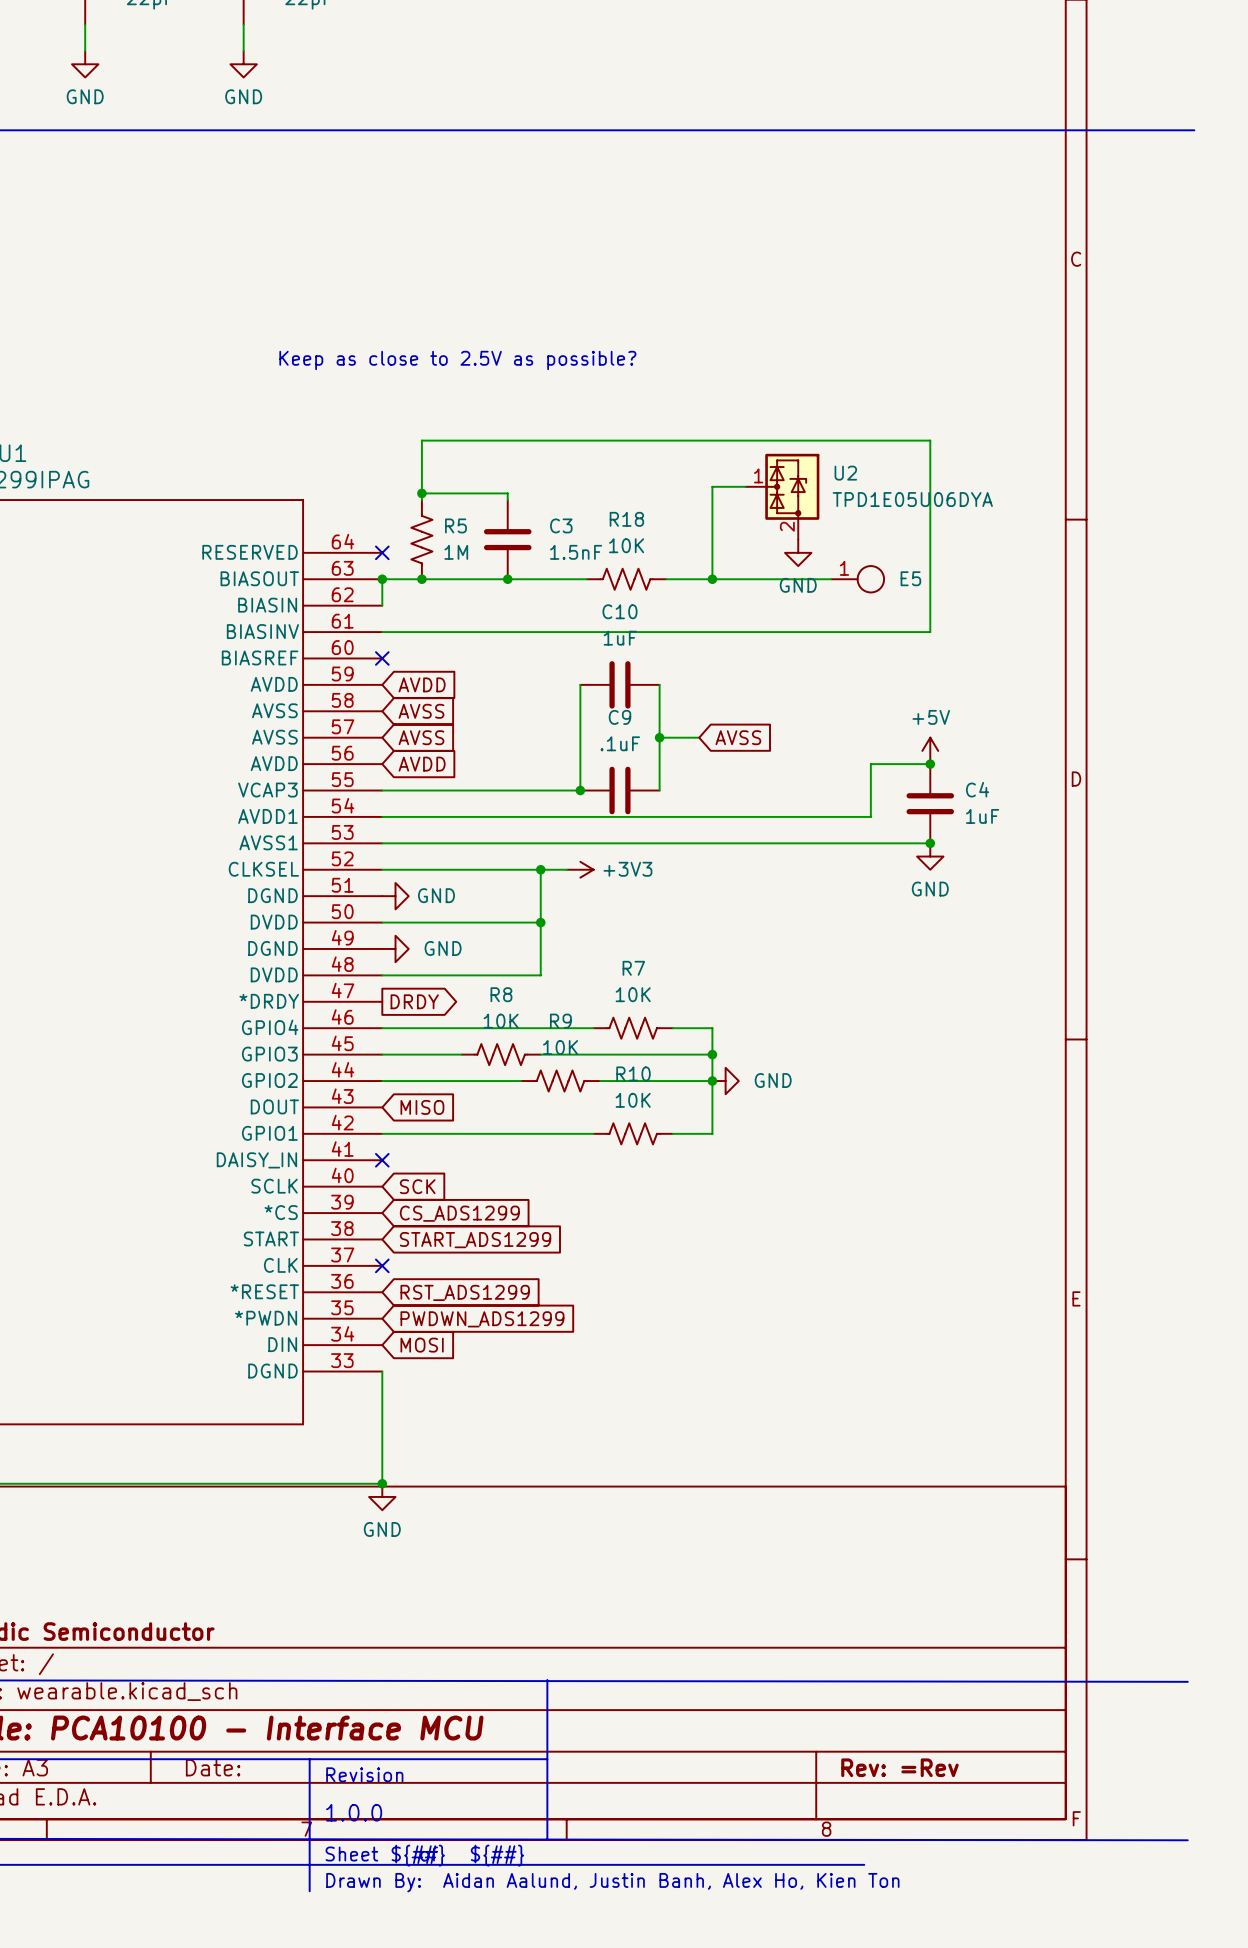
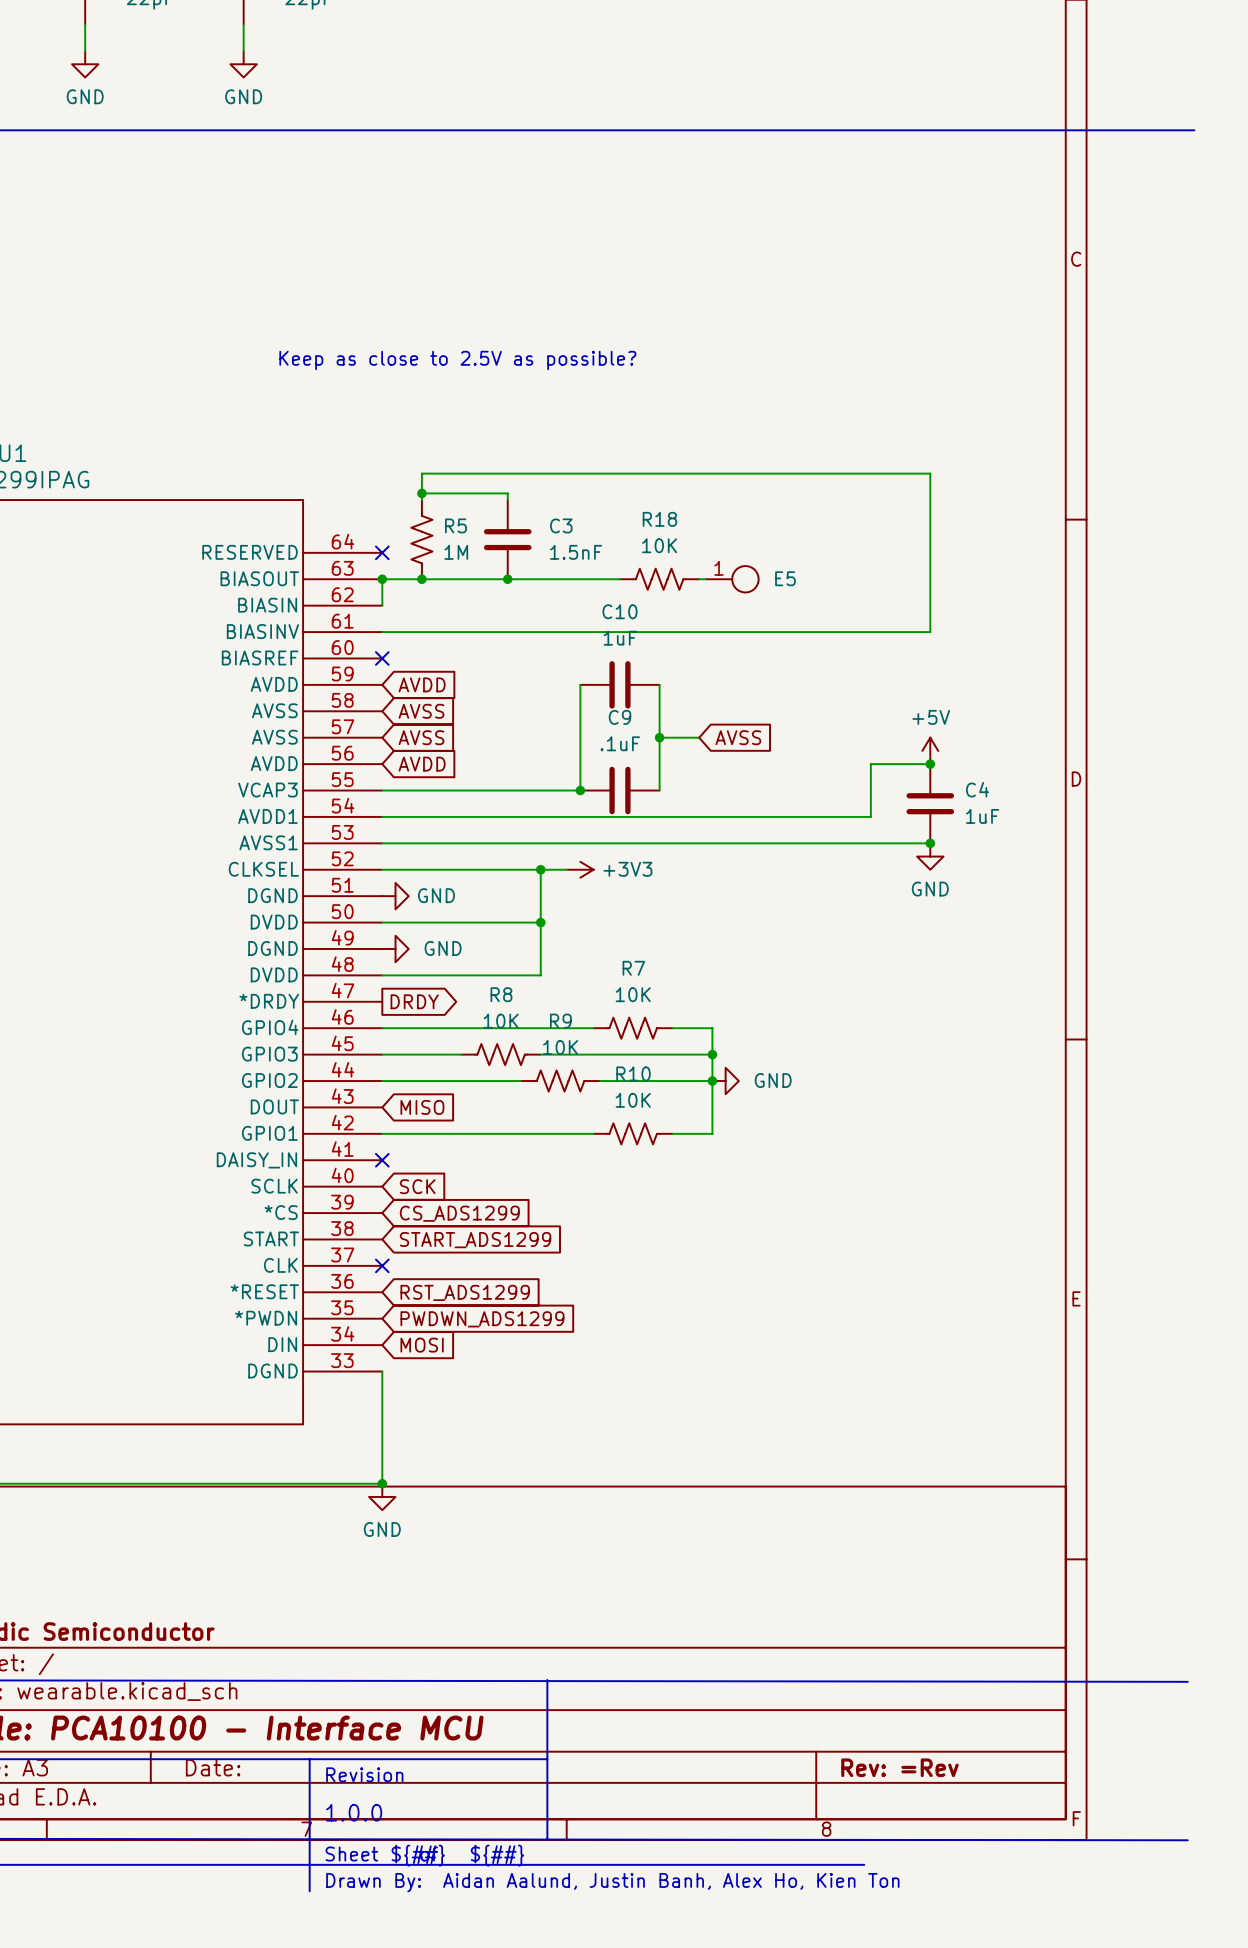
wire: (421, 473) (421, 440) (930, 440) (930, 473) -> (421, 473) (930, 473)
wire: (745, 486) (712, 486) (712, 579) -> none
U2: TPD1E05U06DYA (782, 496) -> none
power symbol: GND (798, 552) -> none
R18 position: (626, 579) -> (659, 579)
wire: (705, 579) (831, 579) -> none
junction: (712, 579) -> none
E5 position: (857, 579) -> (732, 579)

